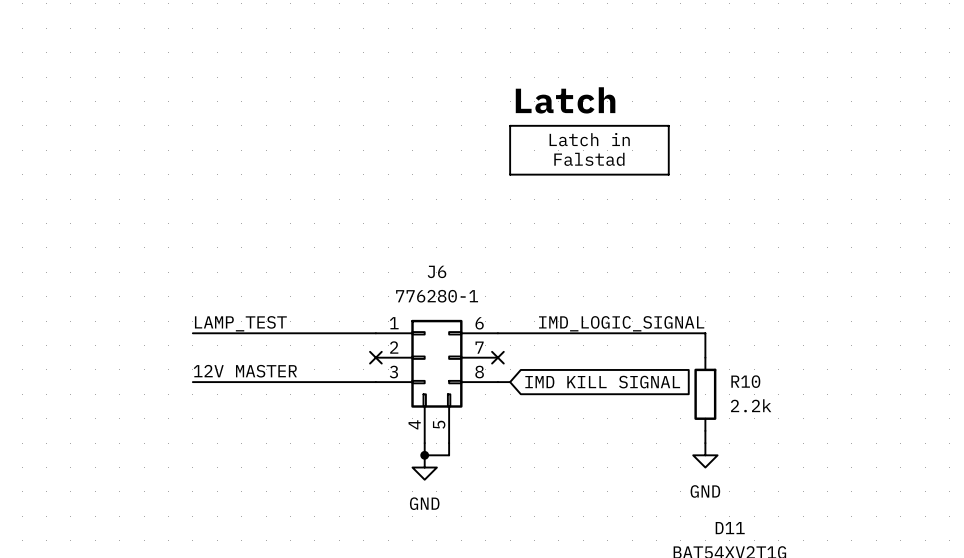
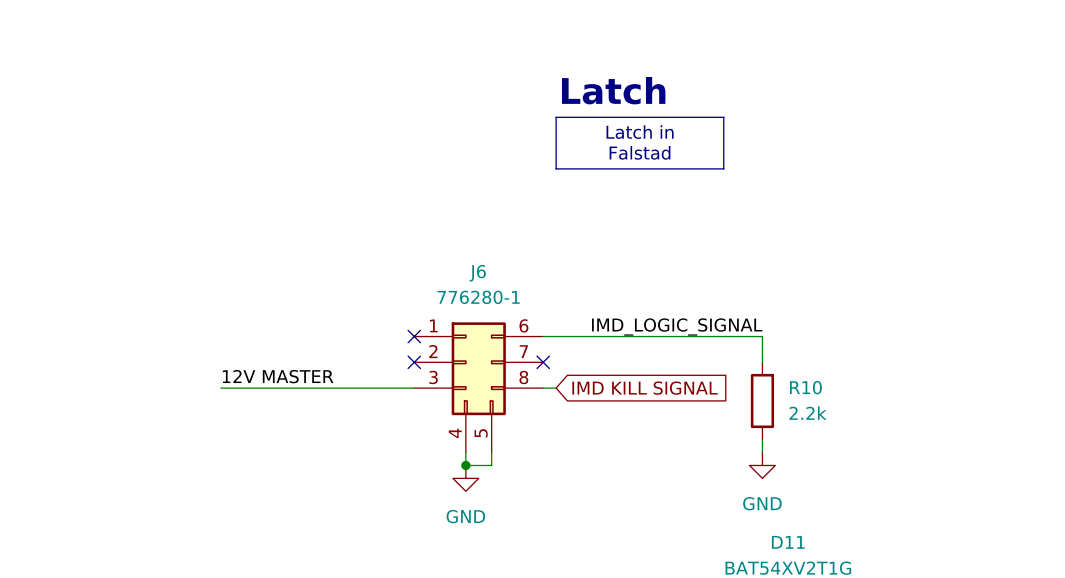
label: LAMP_TEST (240, 323) -> none
wire: (192, 333) (375, 333) -> none
no-connect mark: none -> (414, 336)

